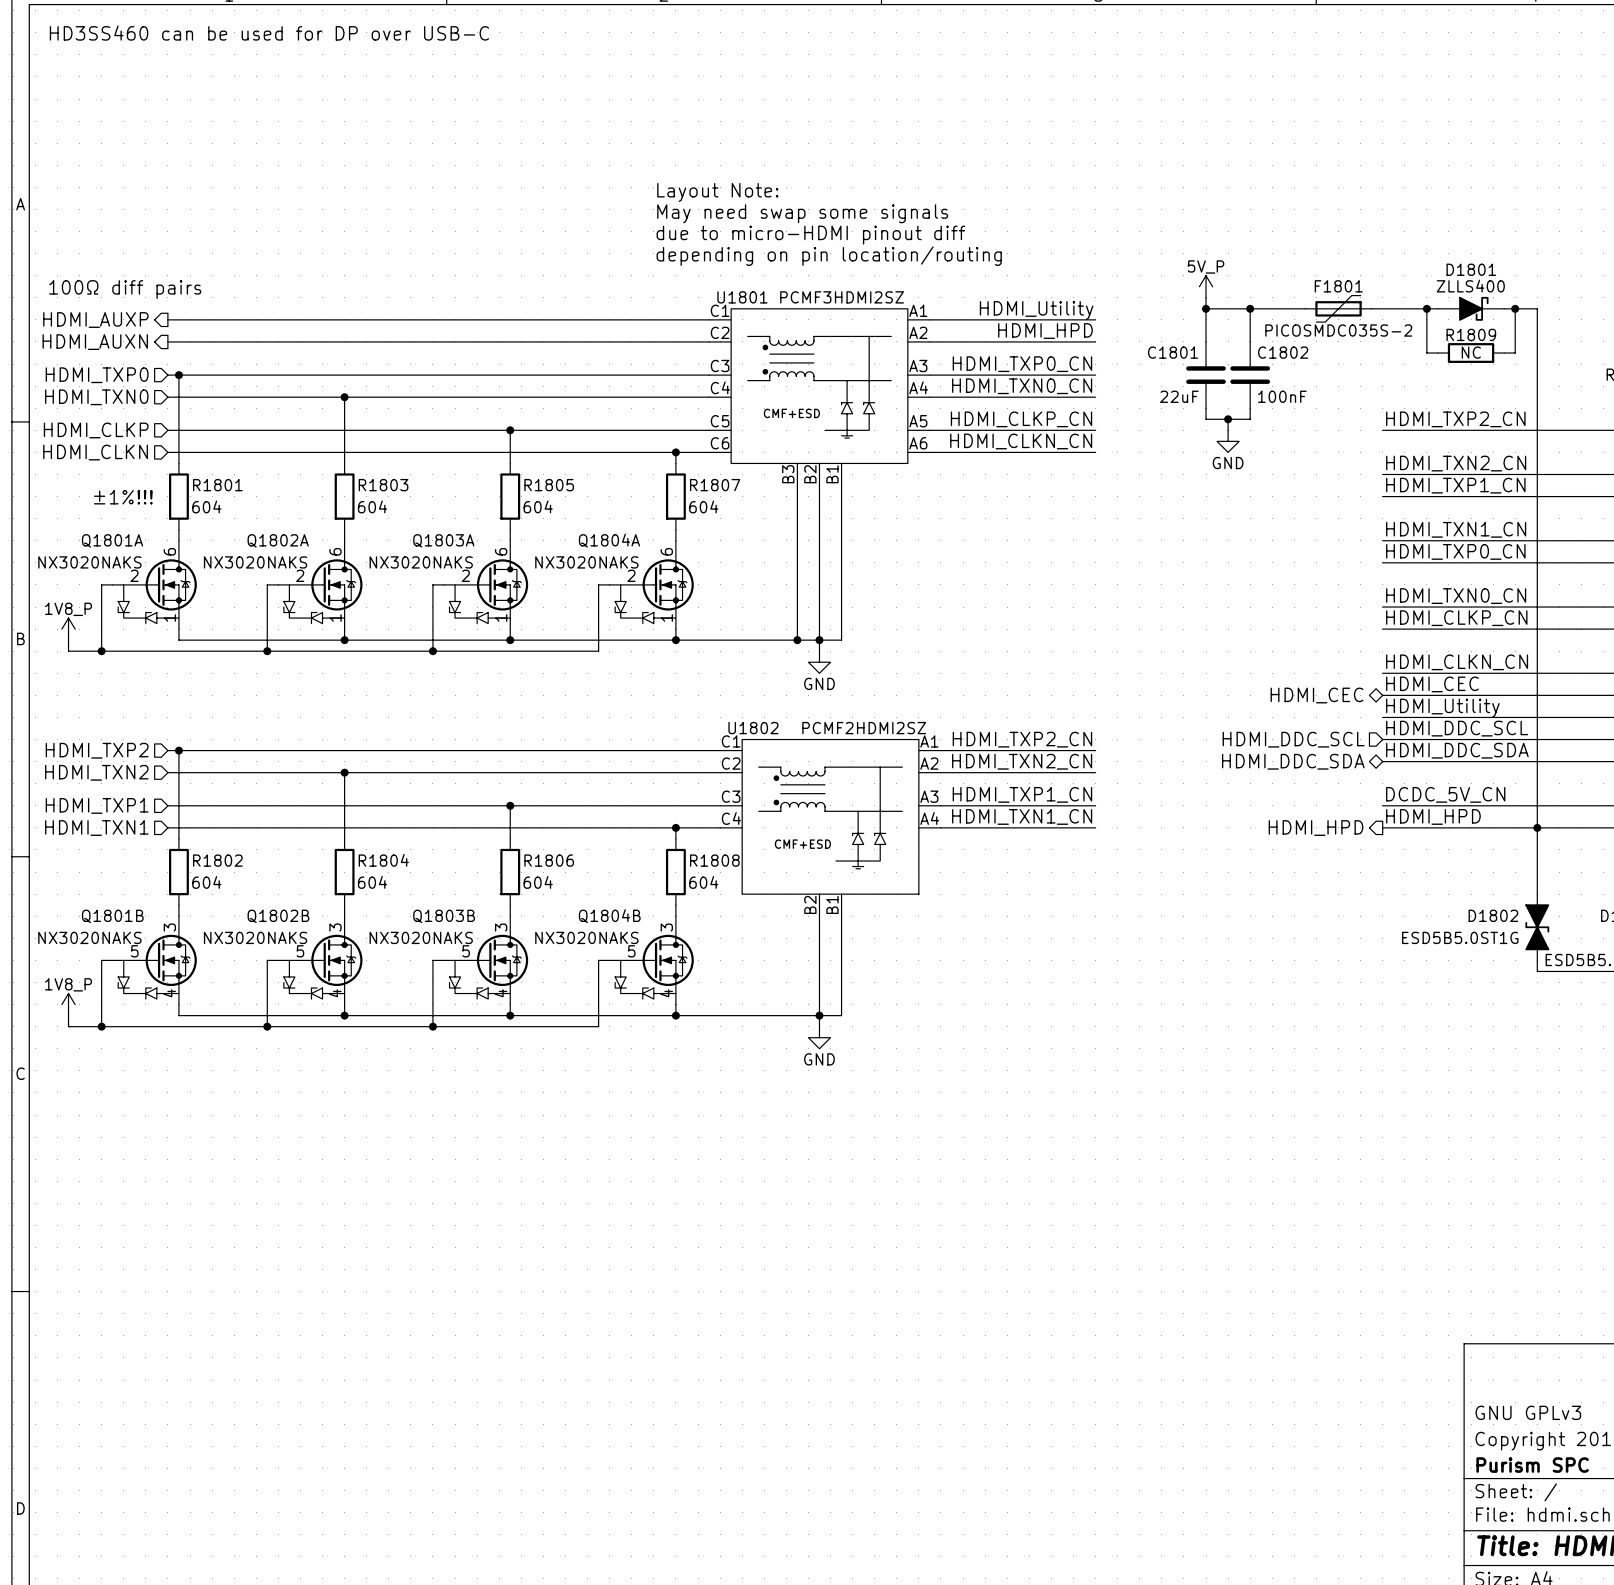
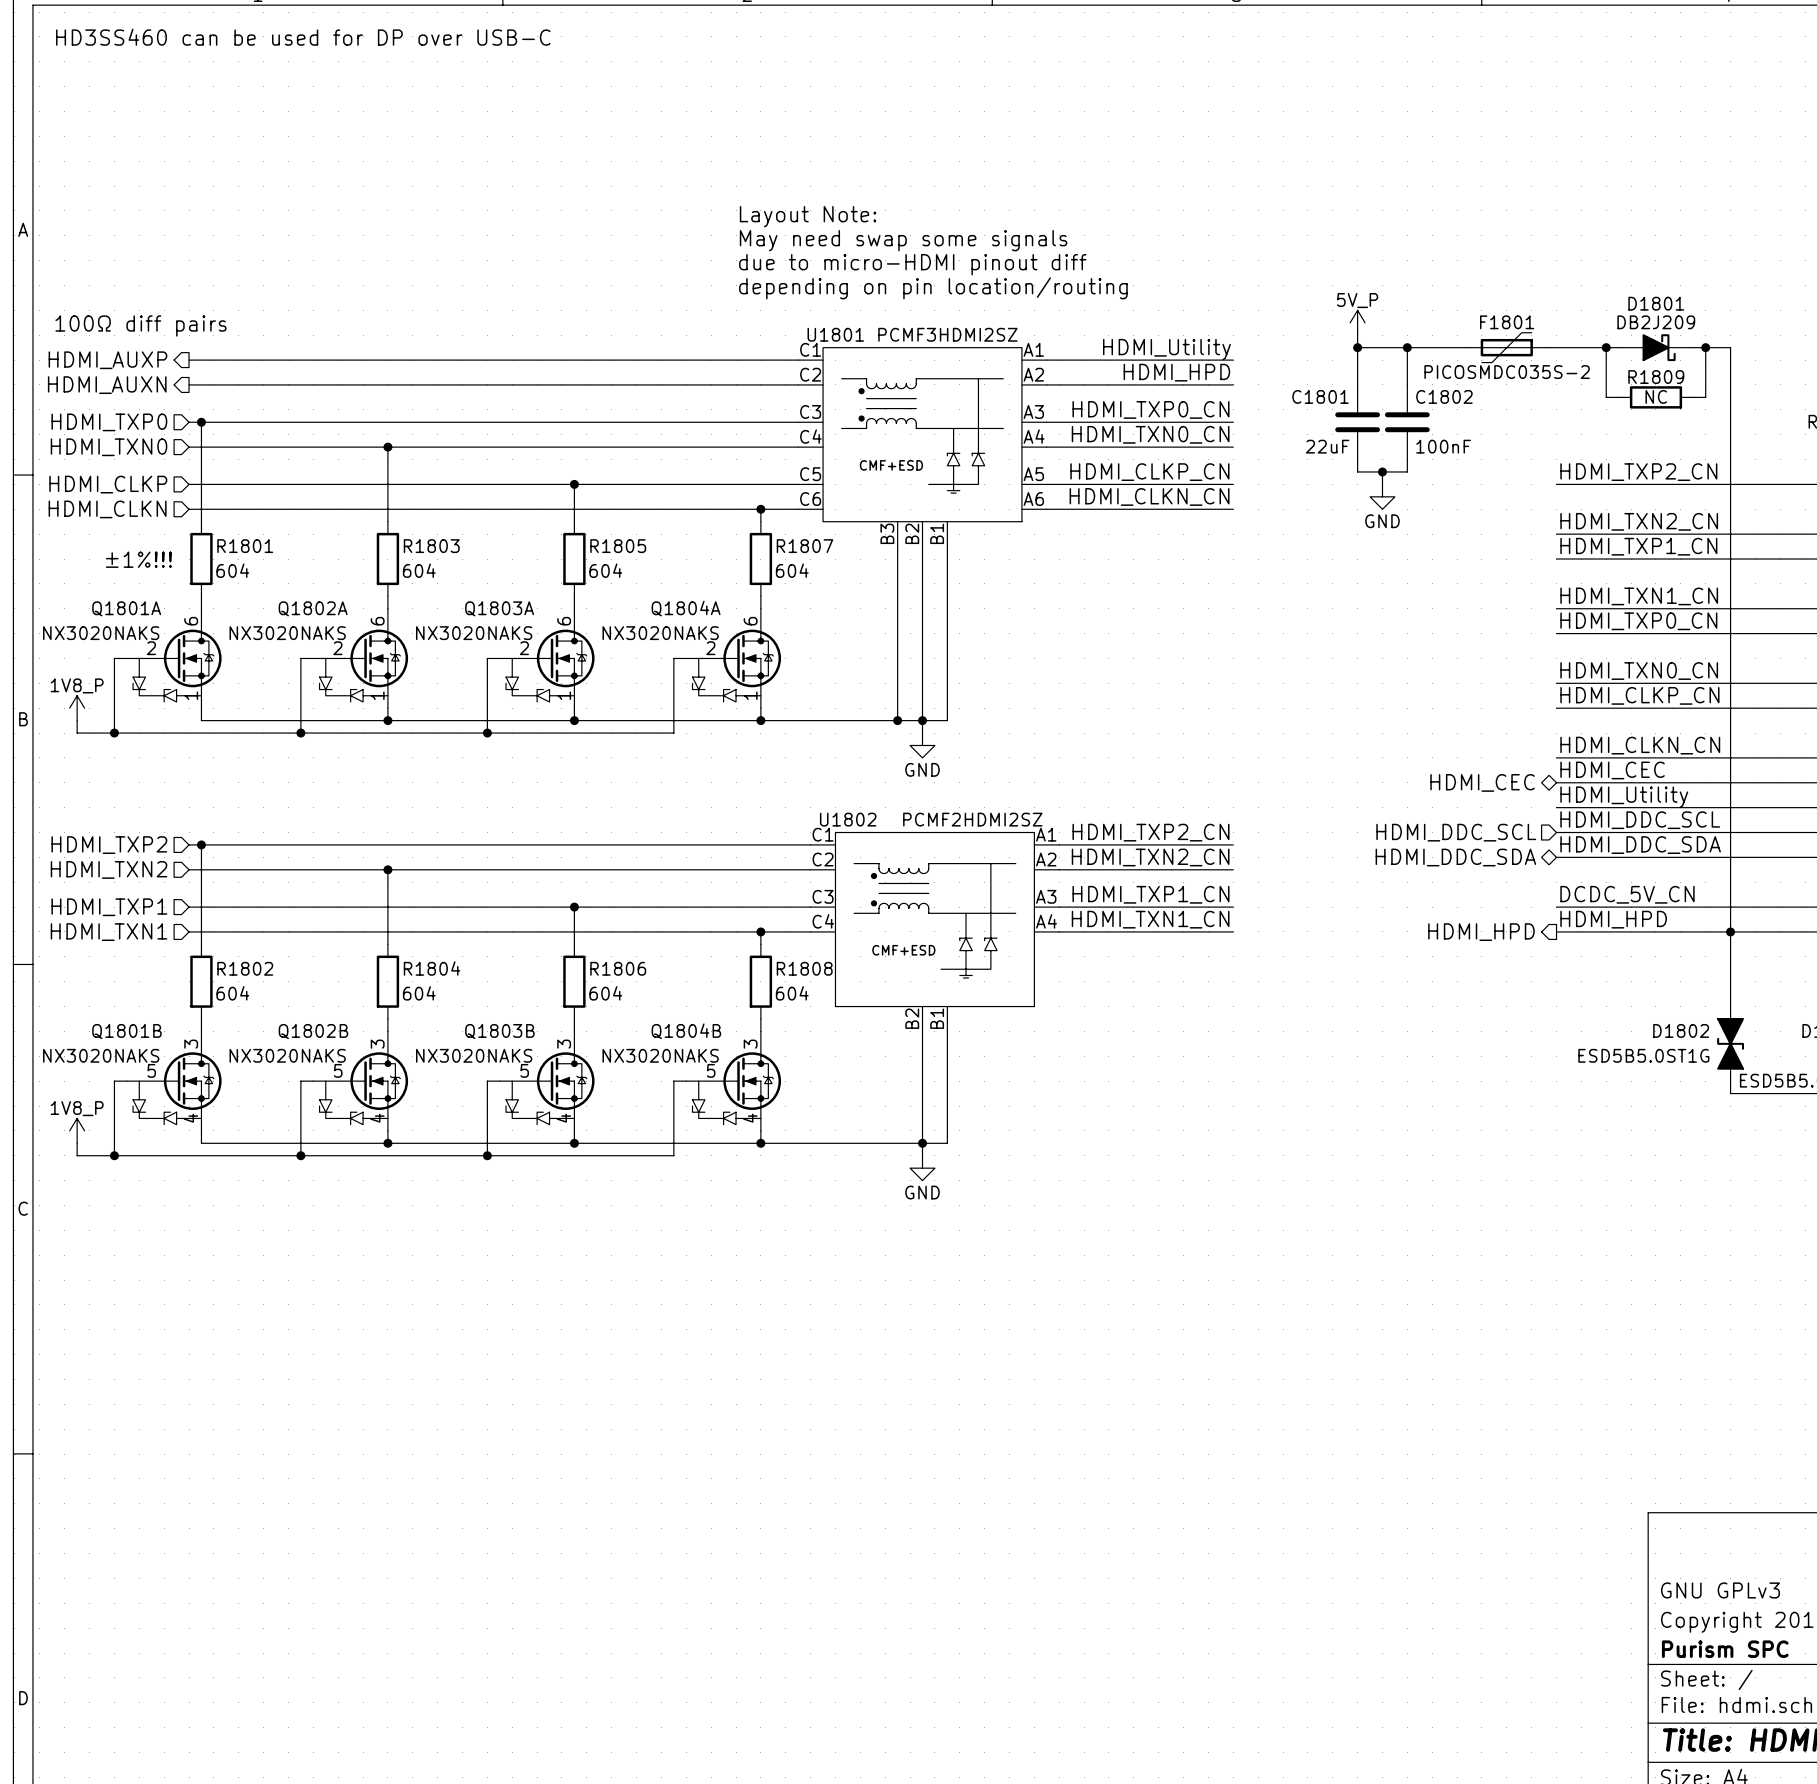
D1801 value: ZLLS400 (1470, 286) -> DB2J209 (1656, 322)
D1801 flip: as is (1473, 308) -> up-down (1659, 347)

